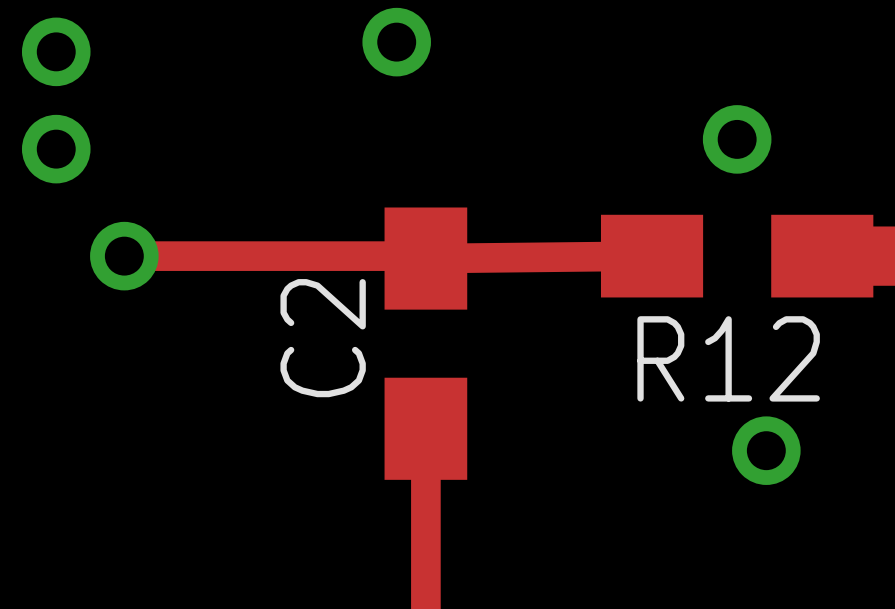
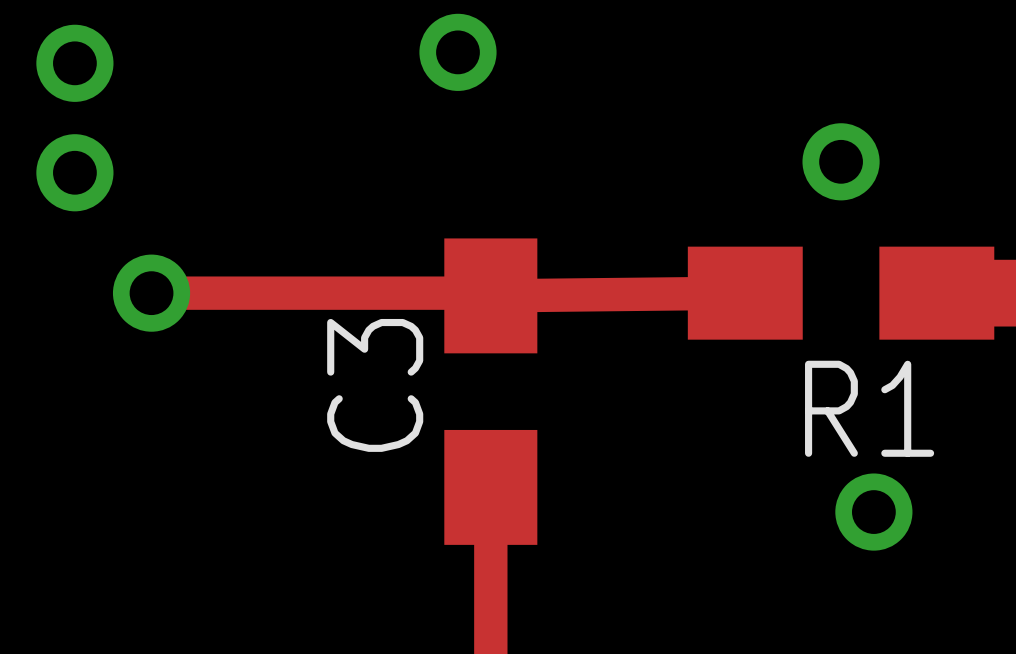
C2 name: C2 (323, 338) -> C3 (375, 385)
R12 name: R12 (728, 358) -> R1 (869, 408)

